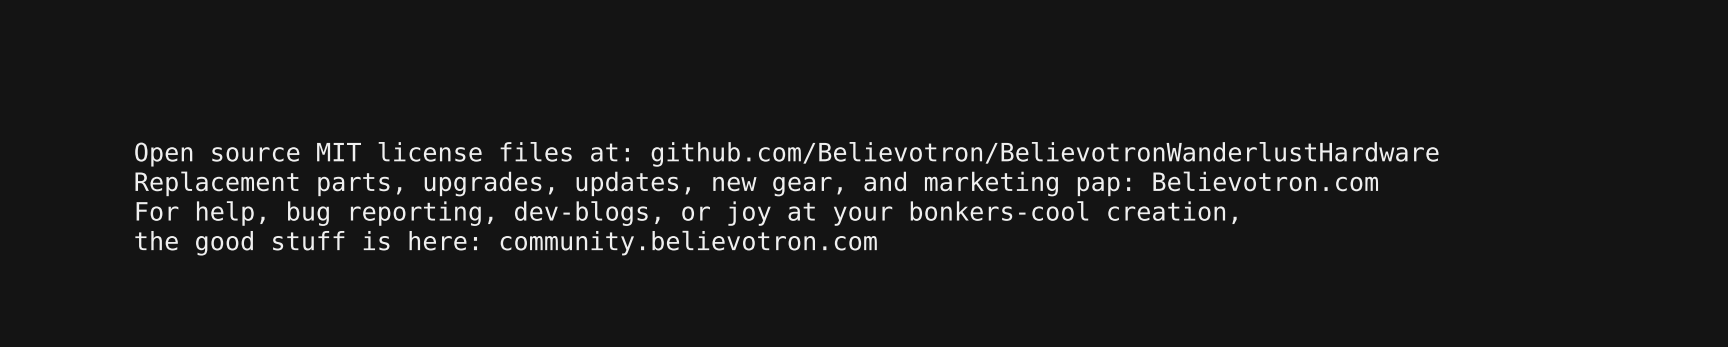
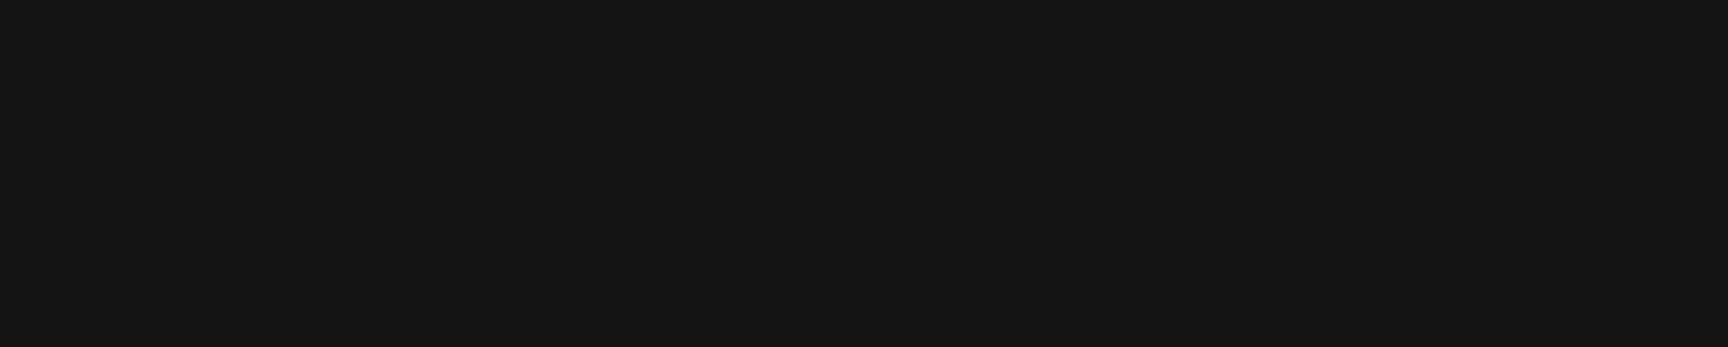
text: Open source MIT license files at: github.com/Believotron/BelievotronWanderlustHardware (786, 154) -> none
text: Replacement parts, upgrades, updates, new gear, and marketing pap: Believotron.com (756, 183) -> none
text: For help, bug reporting, dev-blogs, or joy at your bonkers-cool creation, (686, 213) -> none
text: the good stuff is here: community.believotron.com (506, 243) -> none

